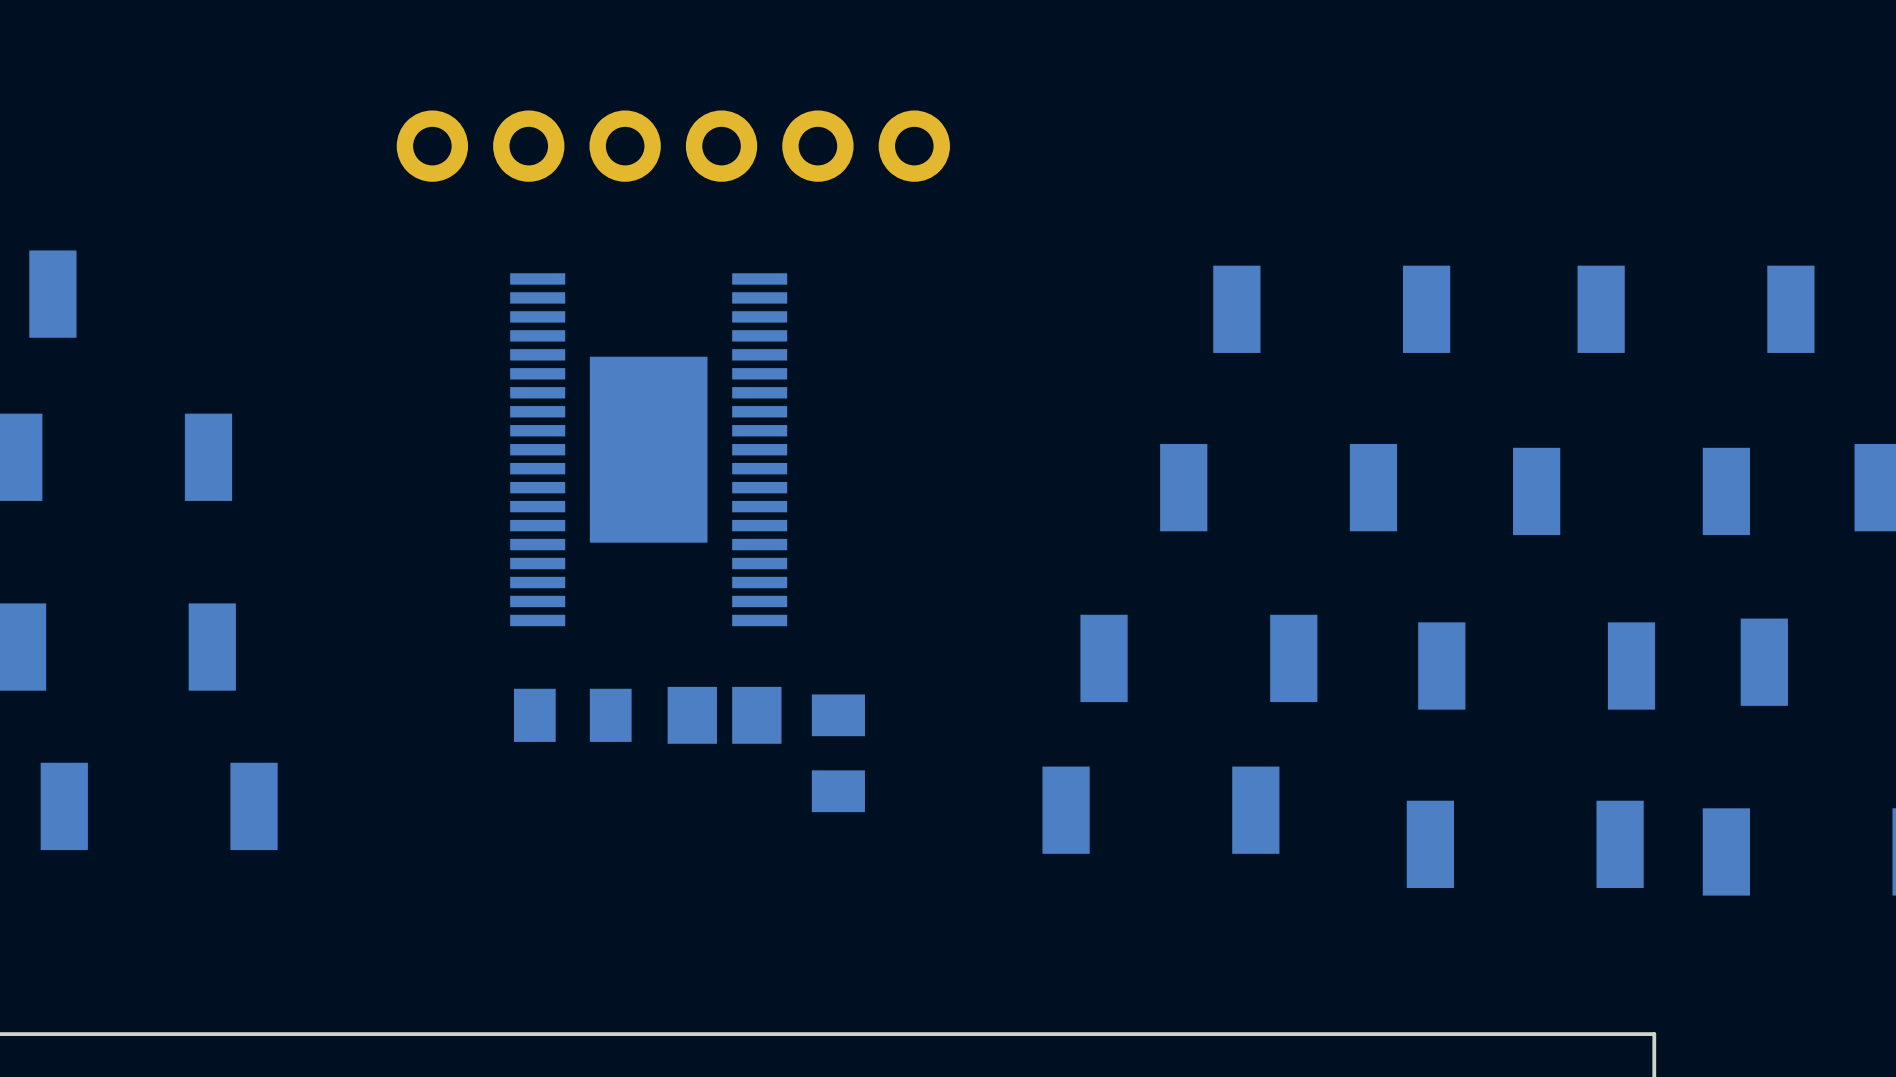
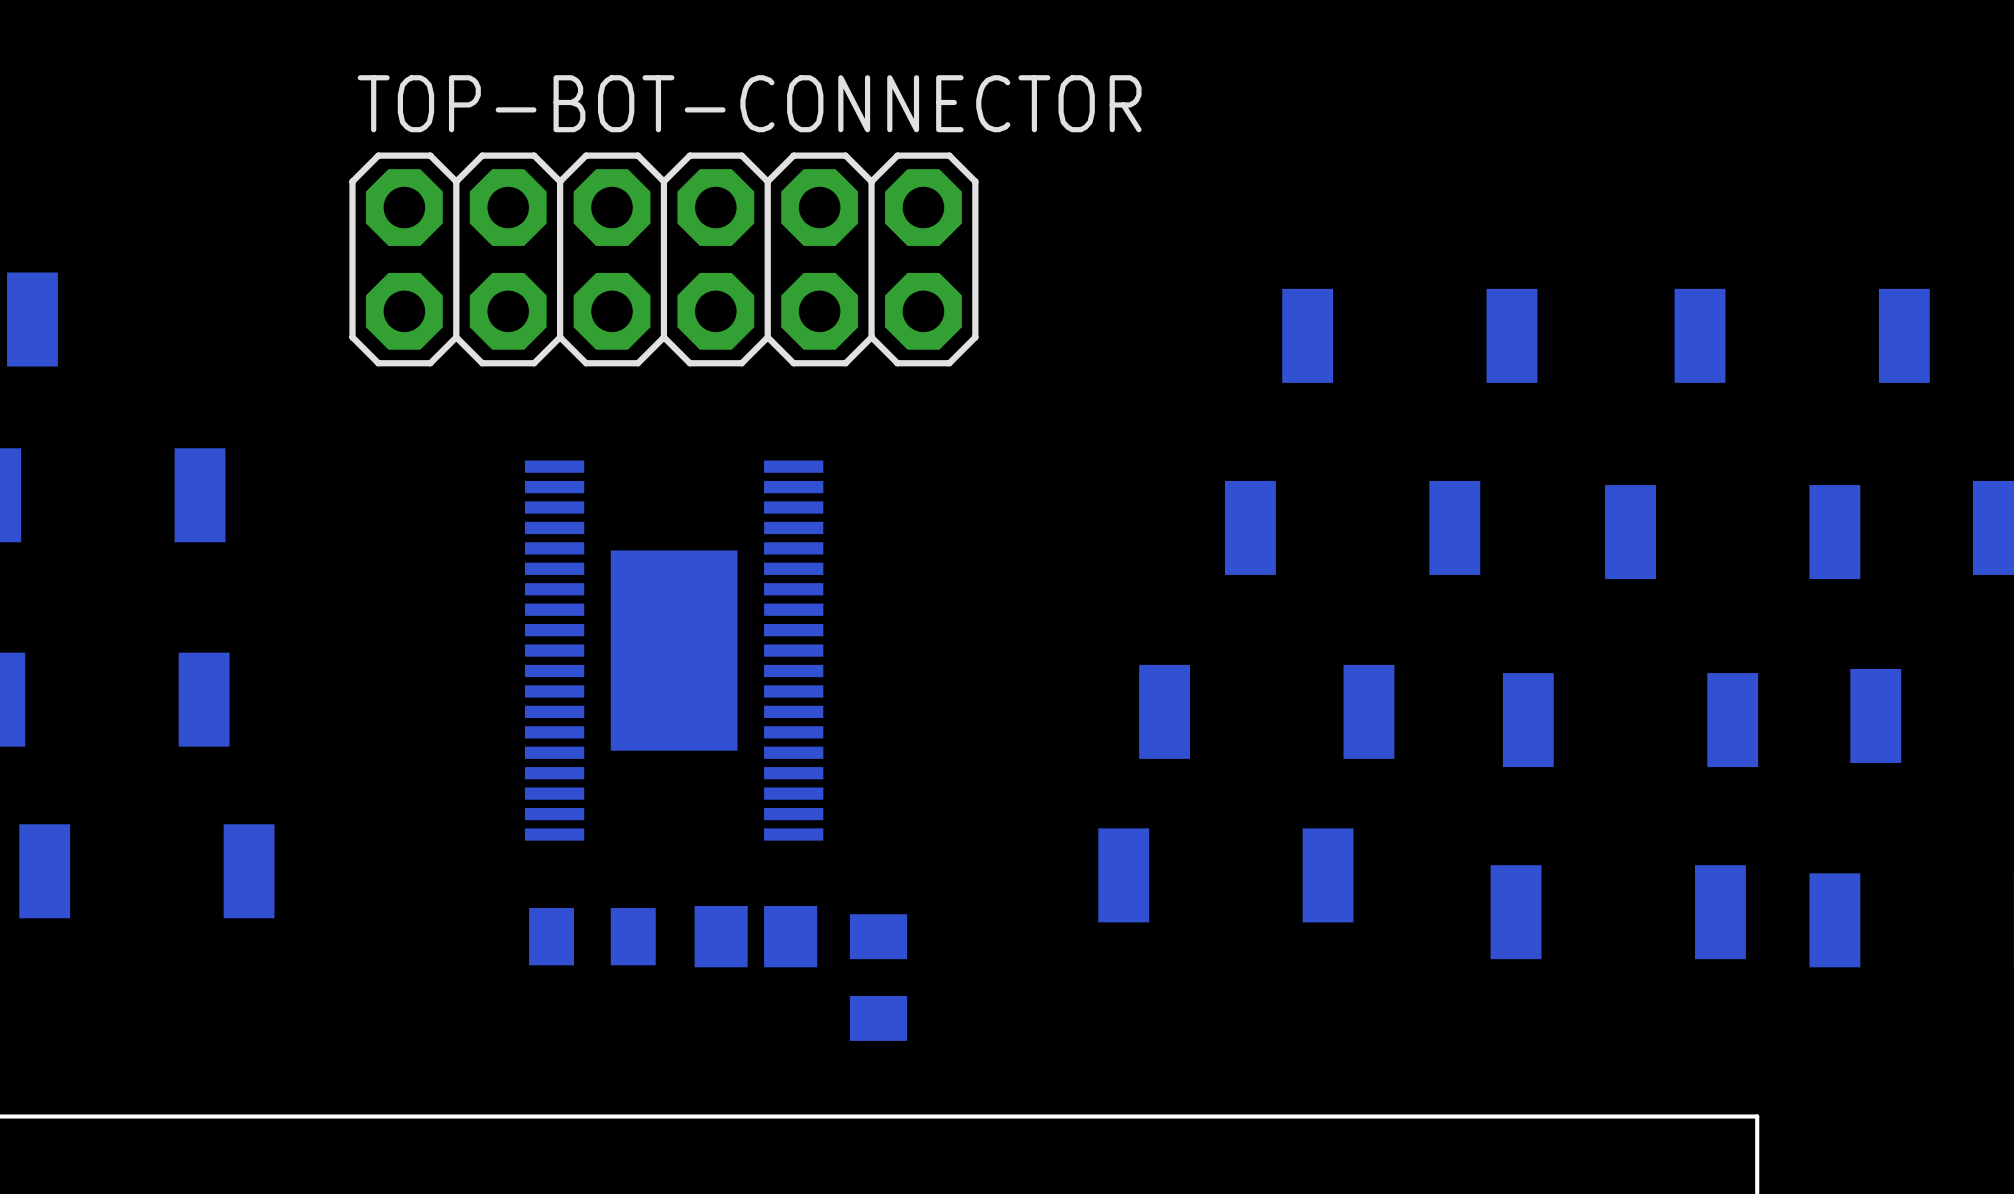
part: (673, 146) -> none
TOP-BOT-CONNECTOR: none -> (663, 259)
part position: (648, 449) -> (674, 650)
part: (572, 715) -> none
part position: (724, 715) -> (755, 936)
part: (838, 753) -> none
part: none -> (592, 936)
part: none -> (878, 977)

